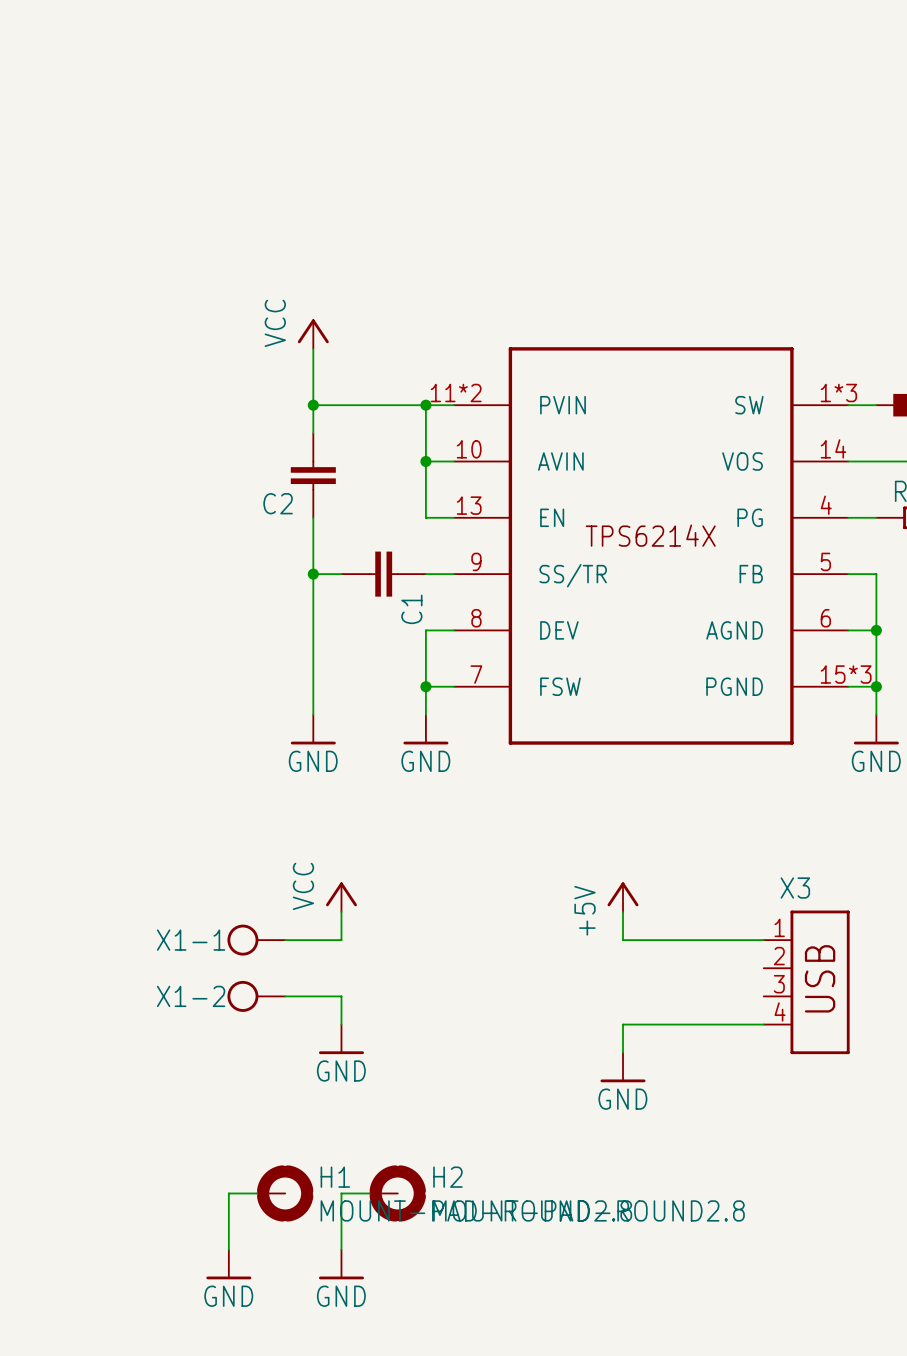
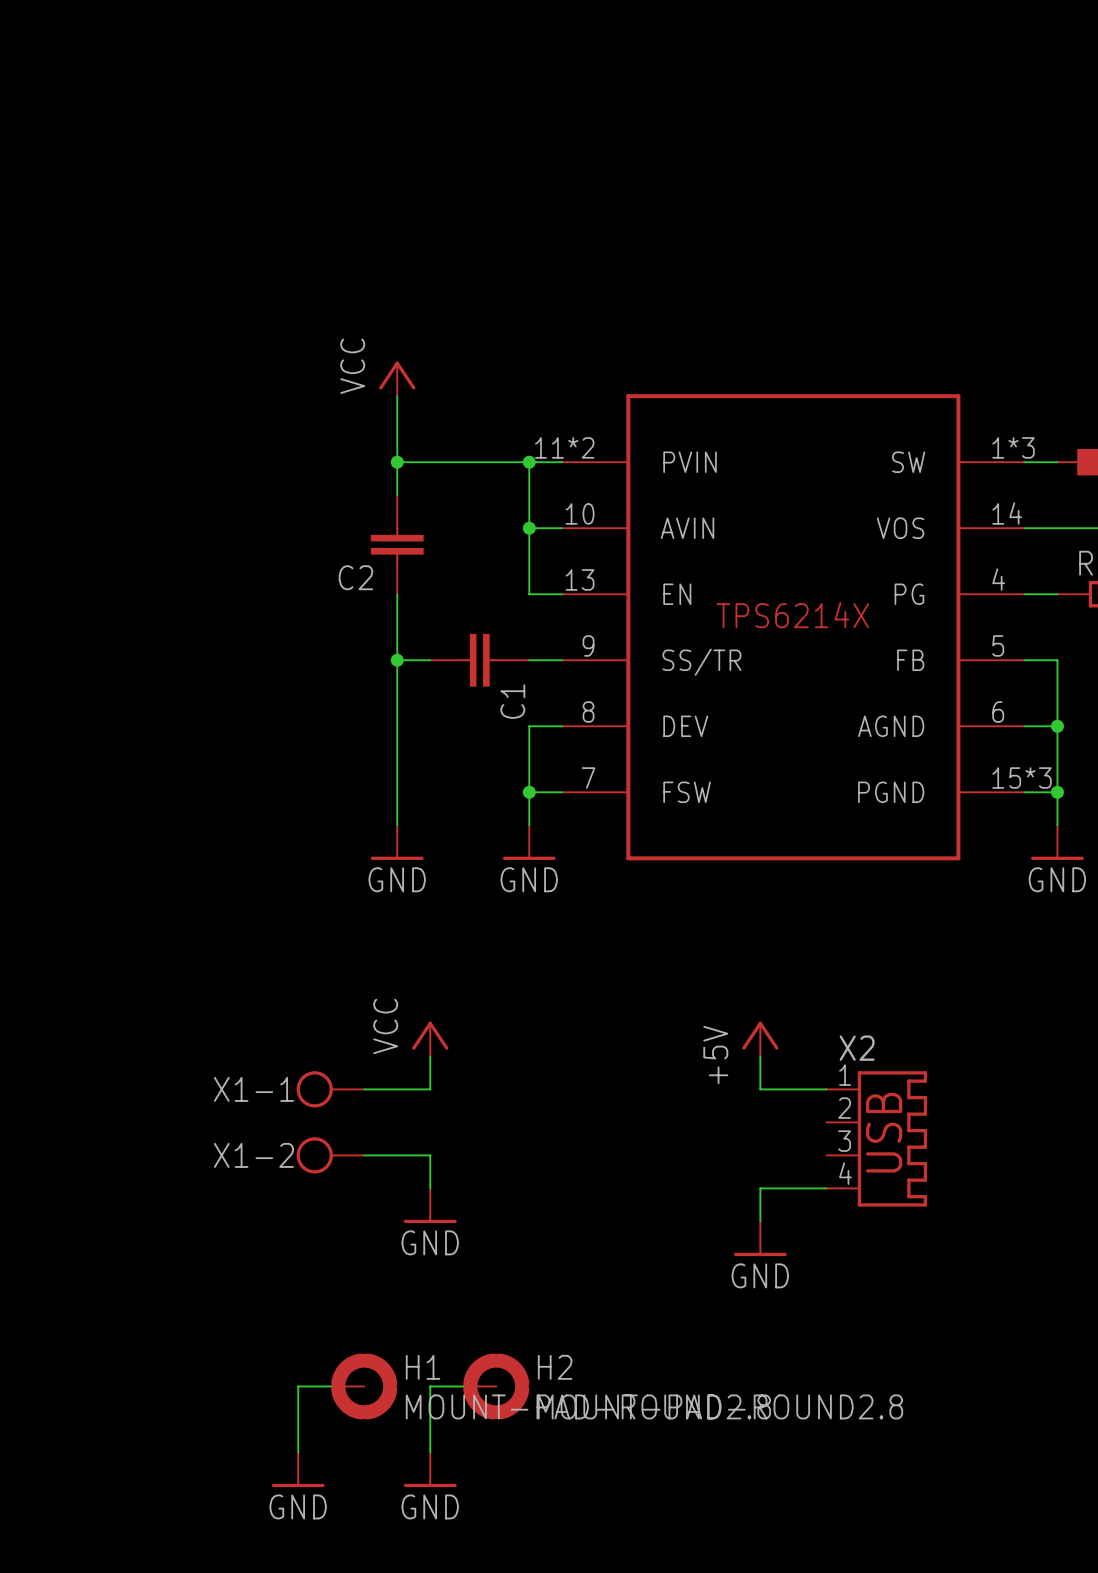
wire: (679, 940) (763, 940) -> none
X2: none -> (876, 1138)
X3: (806, 982) -> none
wire: (679, 1024) (763, 1024) -> none

